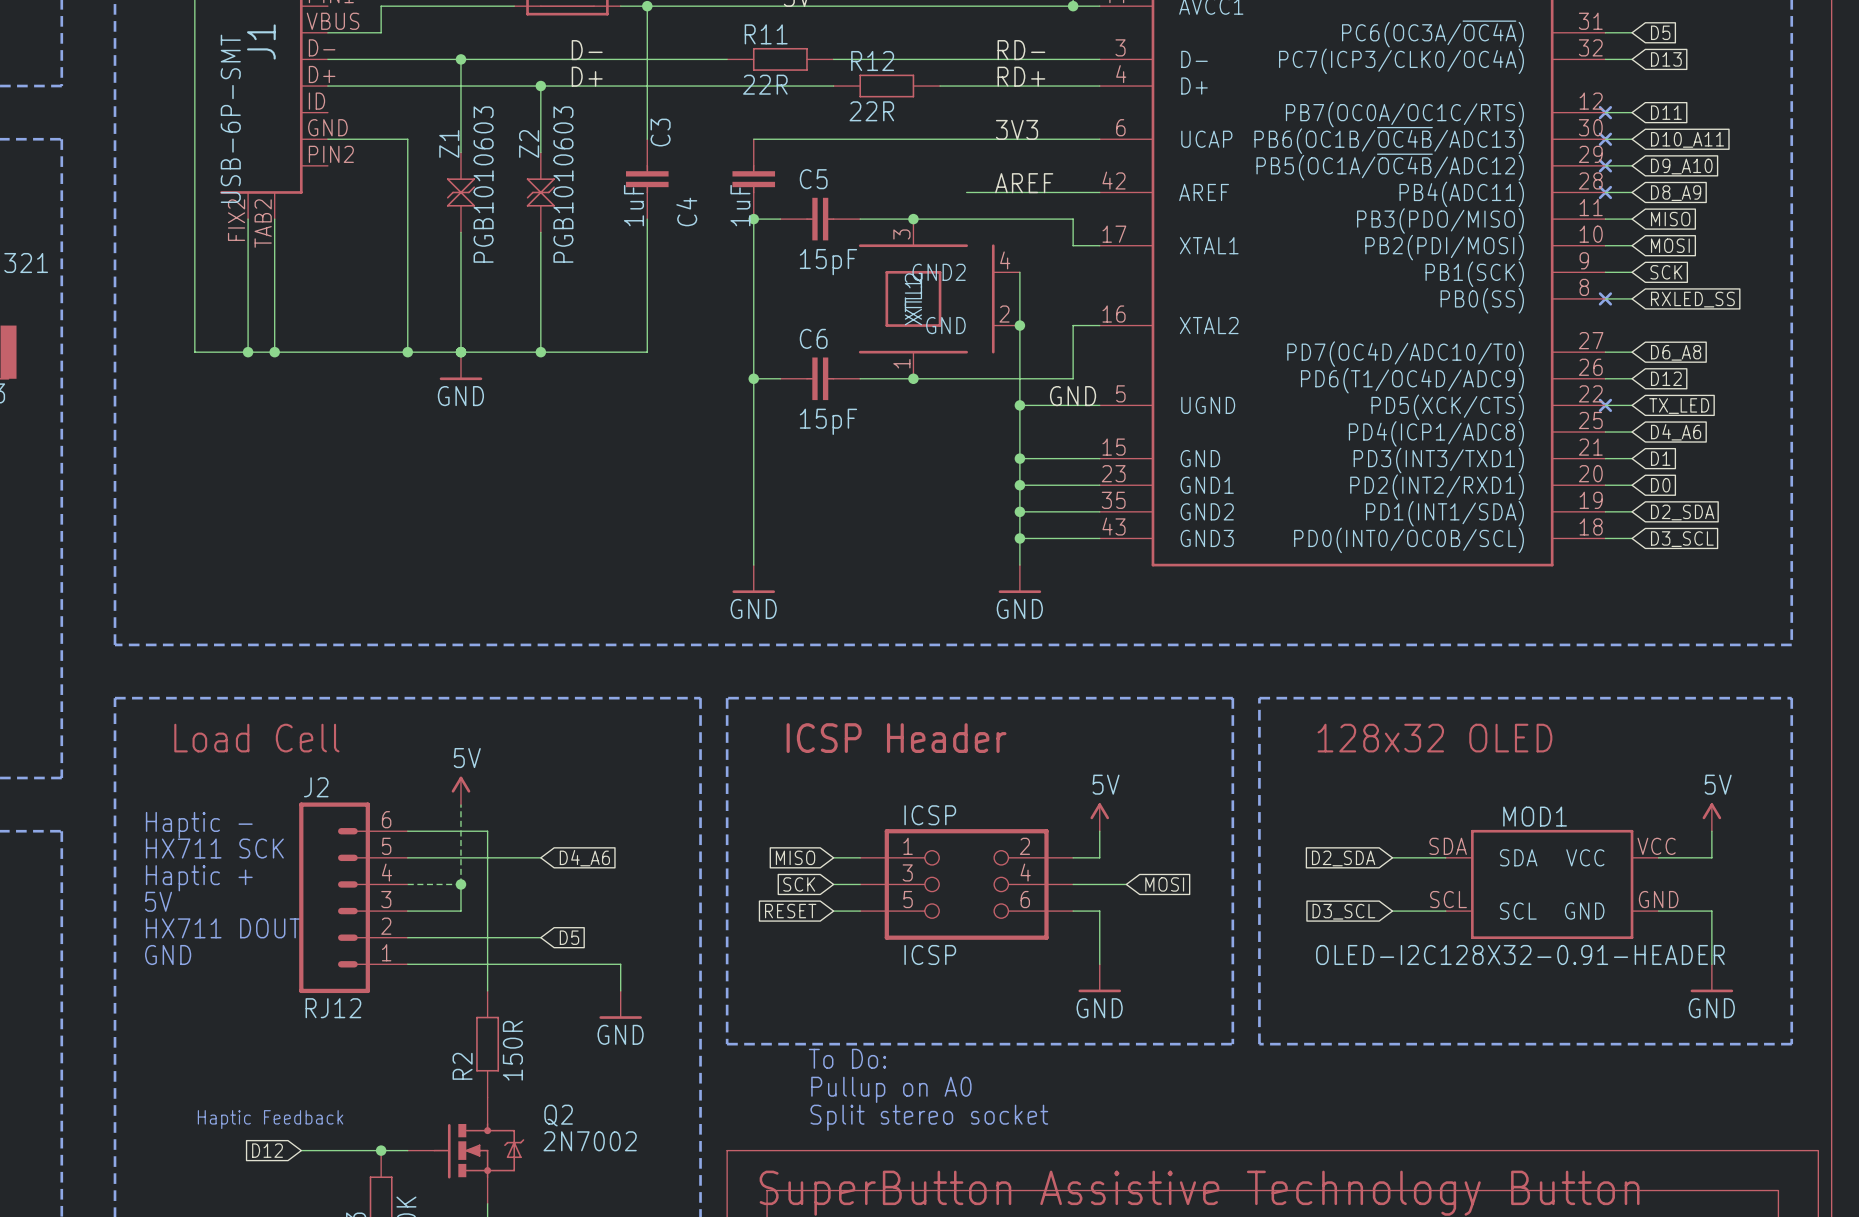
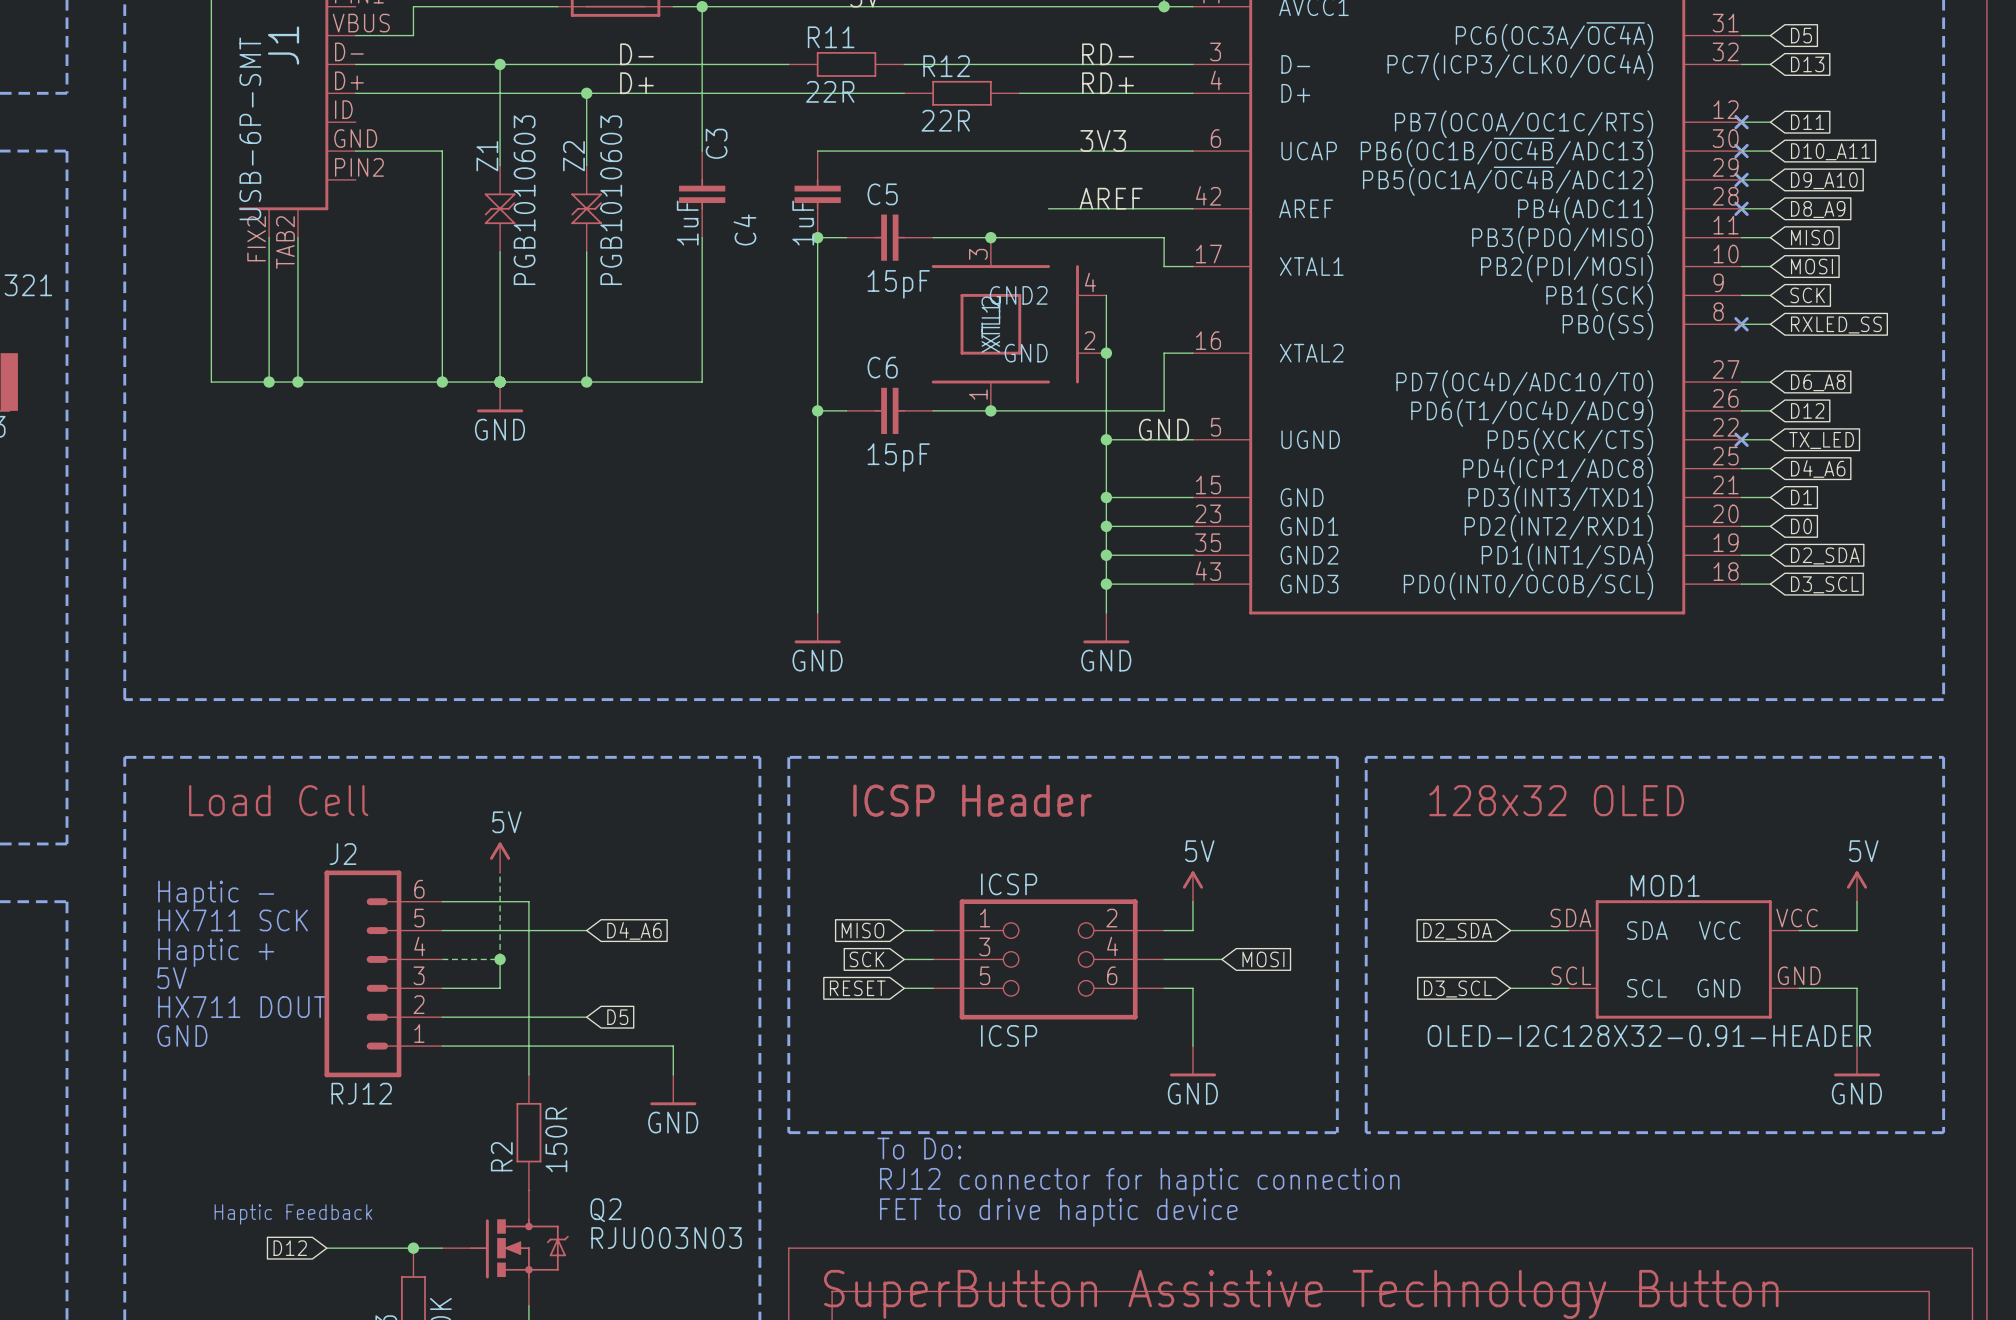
text: Pullup on A0 (891, 1089) -> RJ12 connector for haptic connection (1139, 1182)
text: Split stereo socket (929, 1117) -> FET to drive haptic device (1058, 1212)
Q2 value: 2N7002 (590, 1141) -> RJU003N03 (666, 1238)

